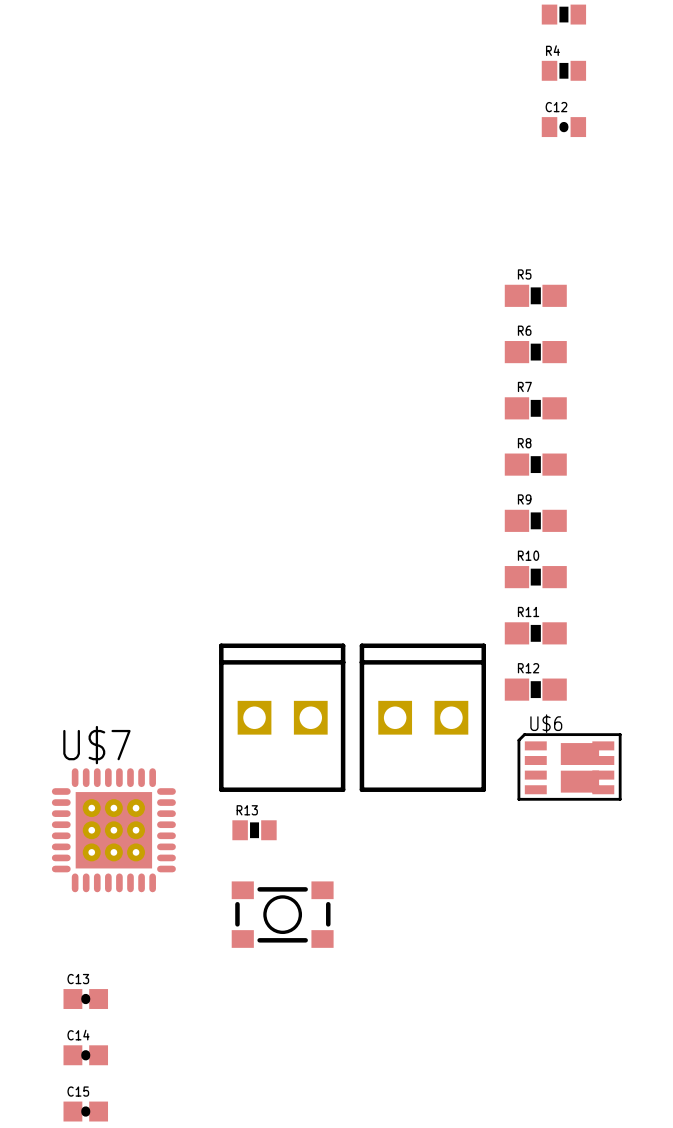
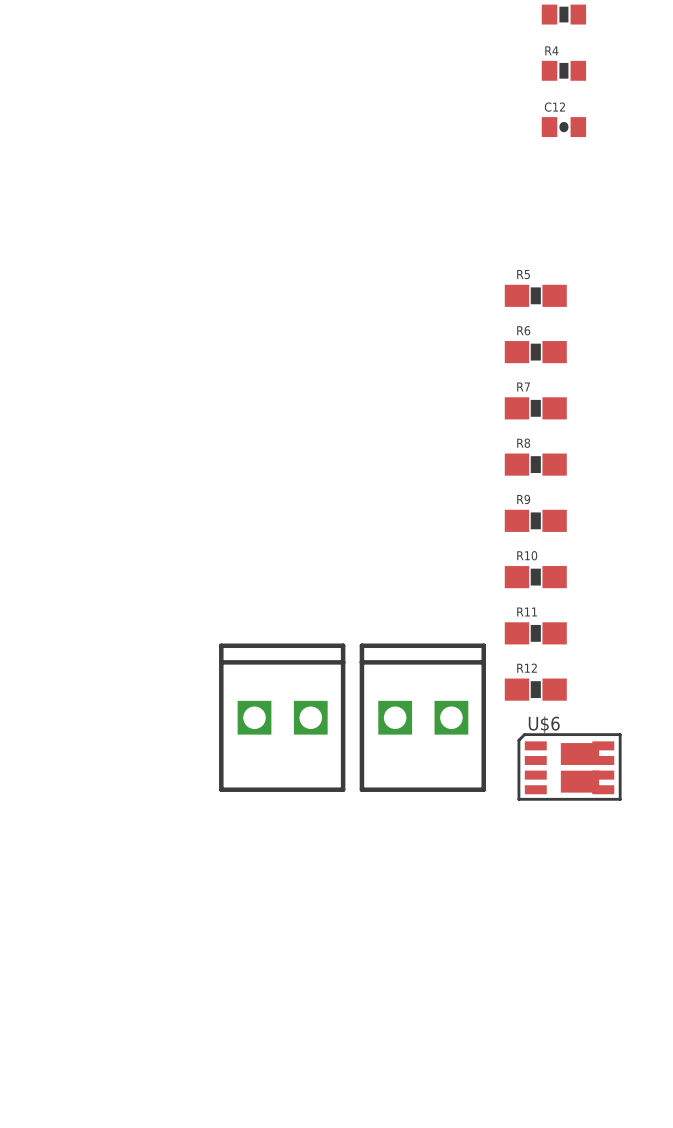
U$7: (113, 830) -> none
R13: (254, 830) -> none
part: (282, 914) -> none
C13: (85, 999) -> none
C14: (85, 1055) -> none
C15: (85, 1111) -> none

